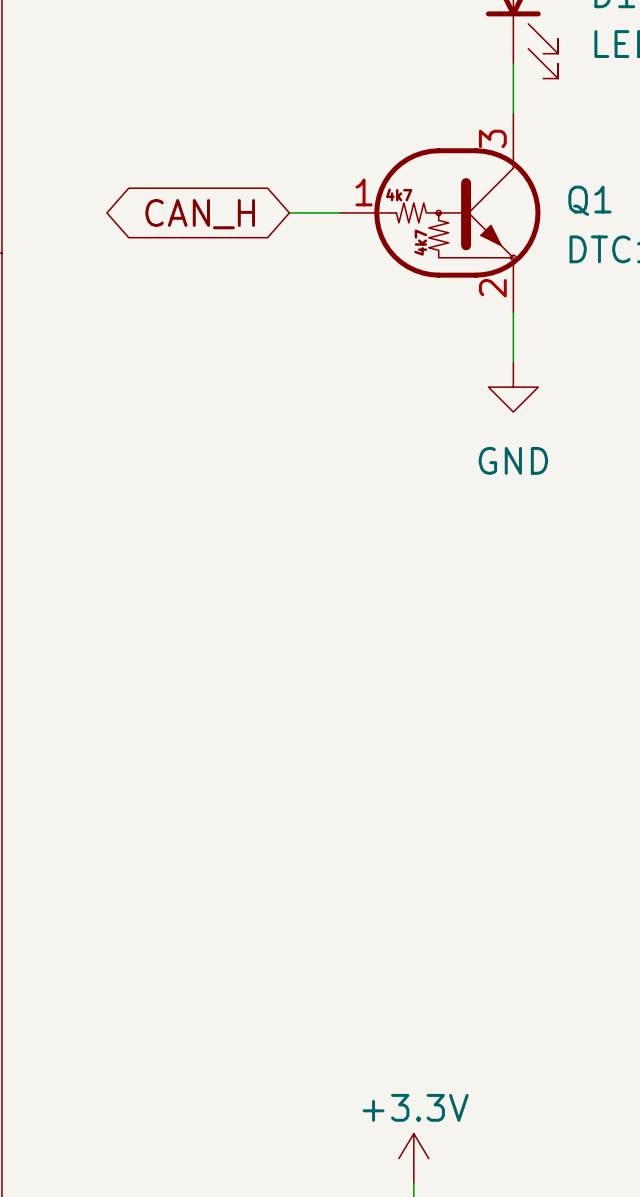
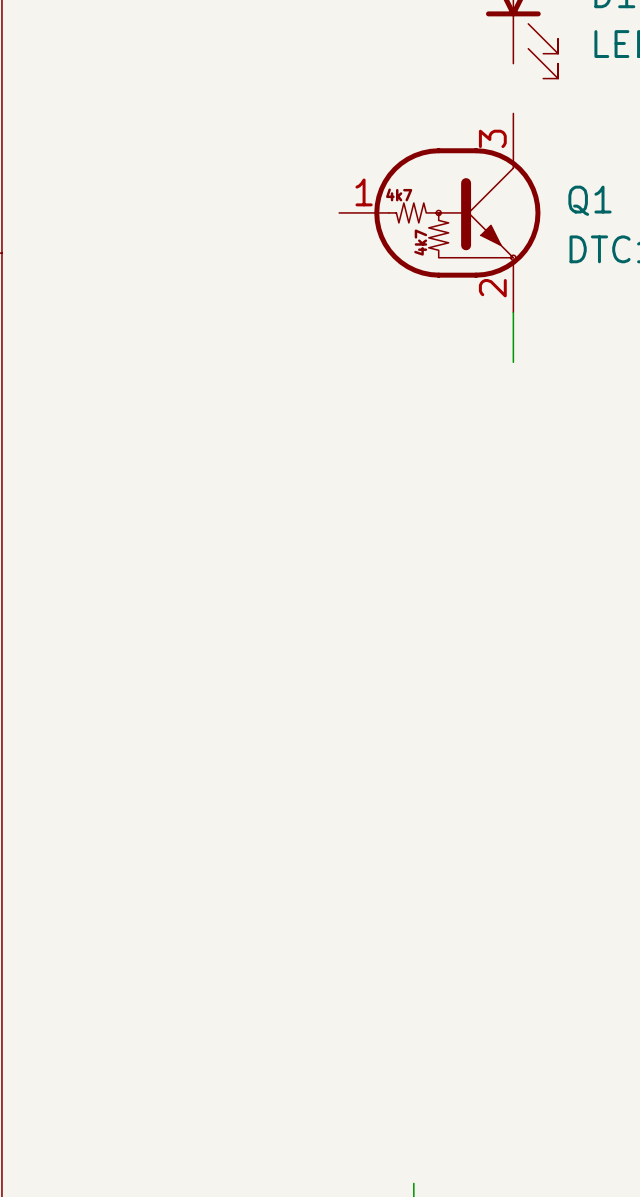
wire: (513, 63) (513, 113) -> none
wire: (289, 212) (339, 212) -> none
global label: CAN_H (200, 214) -> none
power symbol: GND (513, 387) -> none
power symbol: +3.3V (413, 1158) -> none

